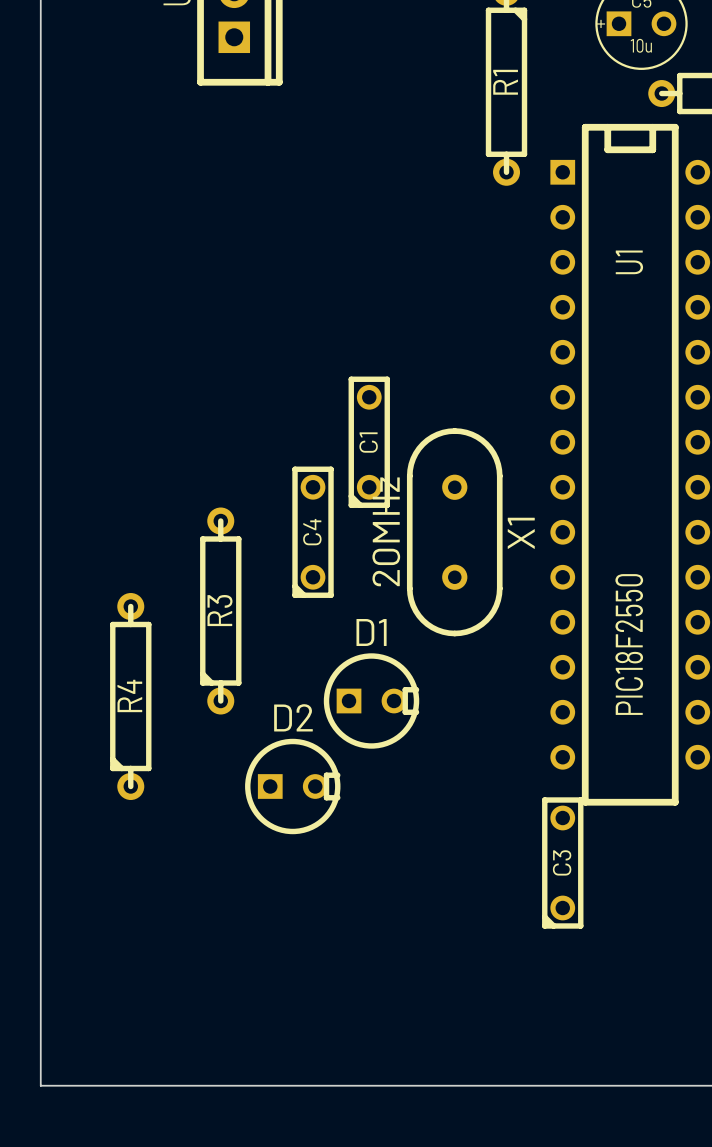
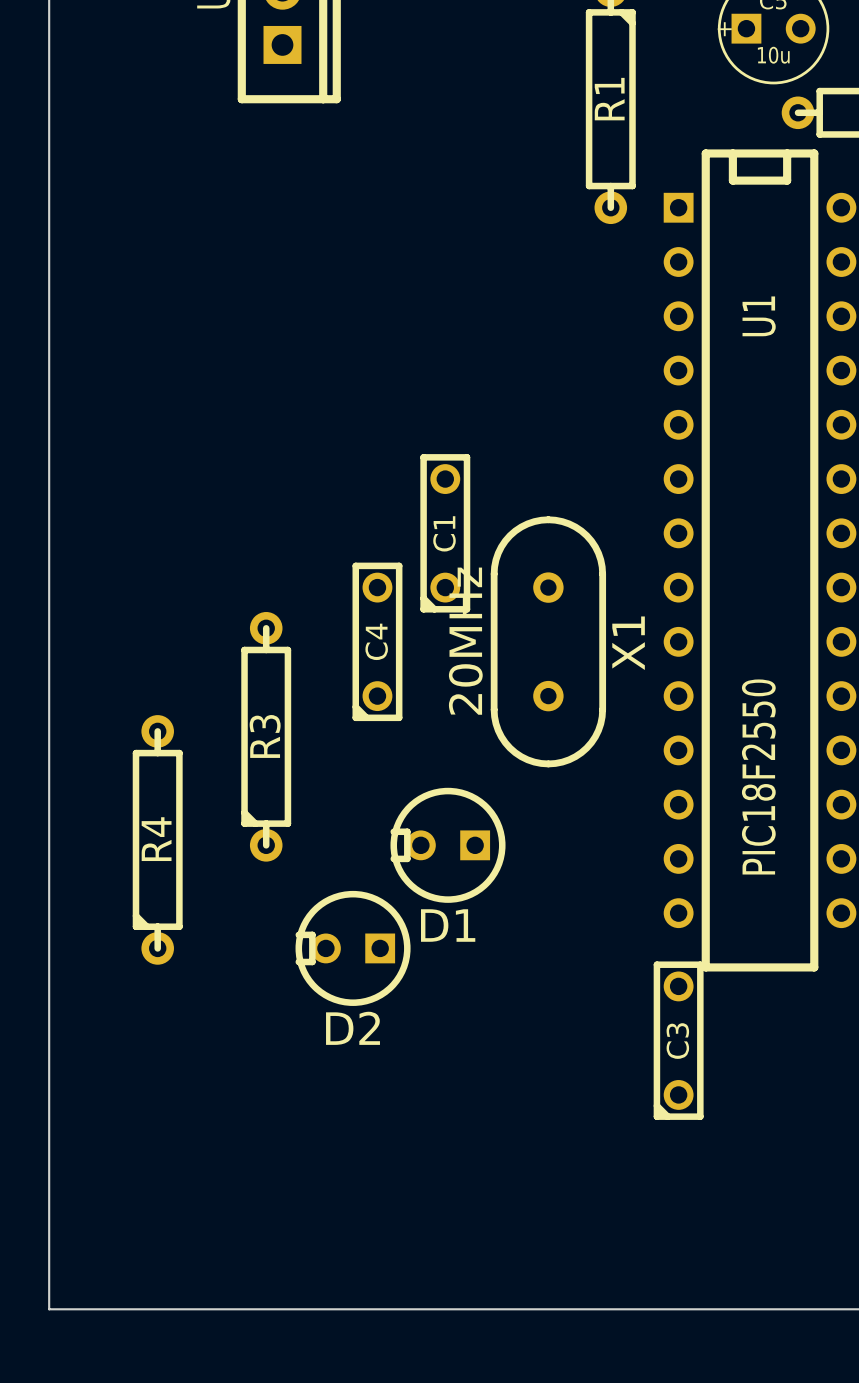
D1 rotation: 0° (371, 701) -> 180° (448, 845)
D2 rotation: 0° (292, 786) -> 180° (353, 948)

